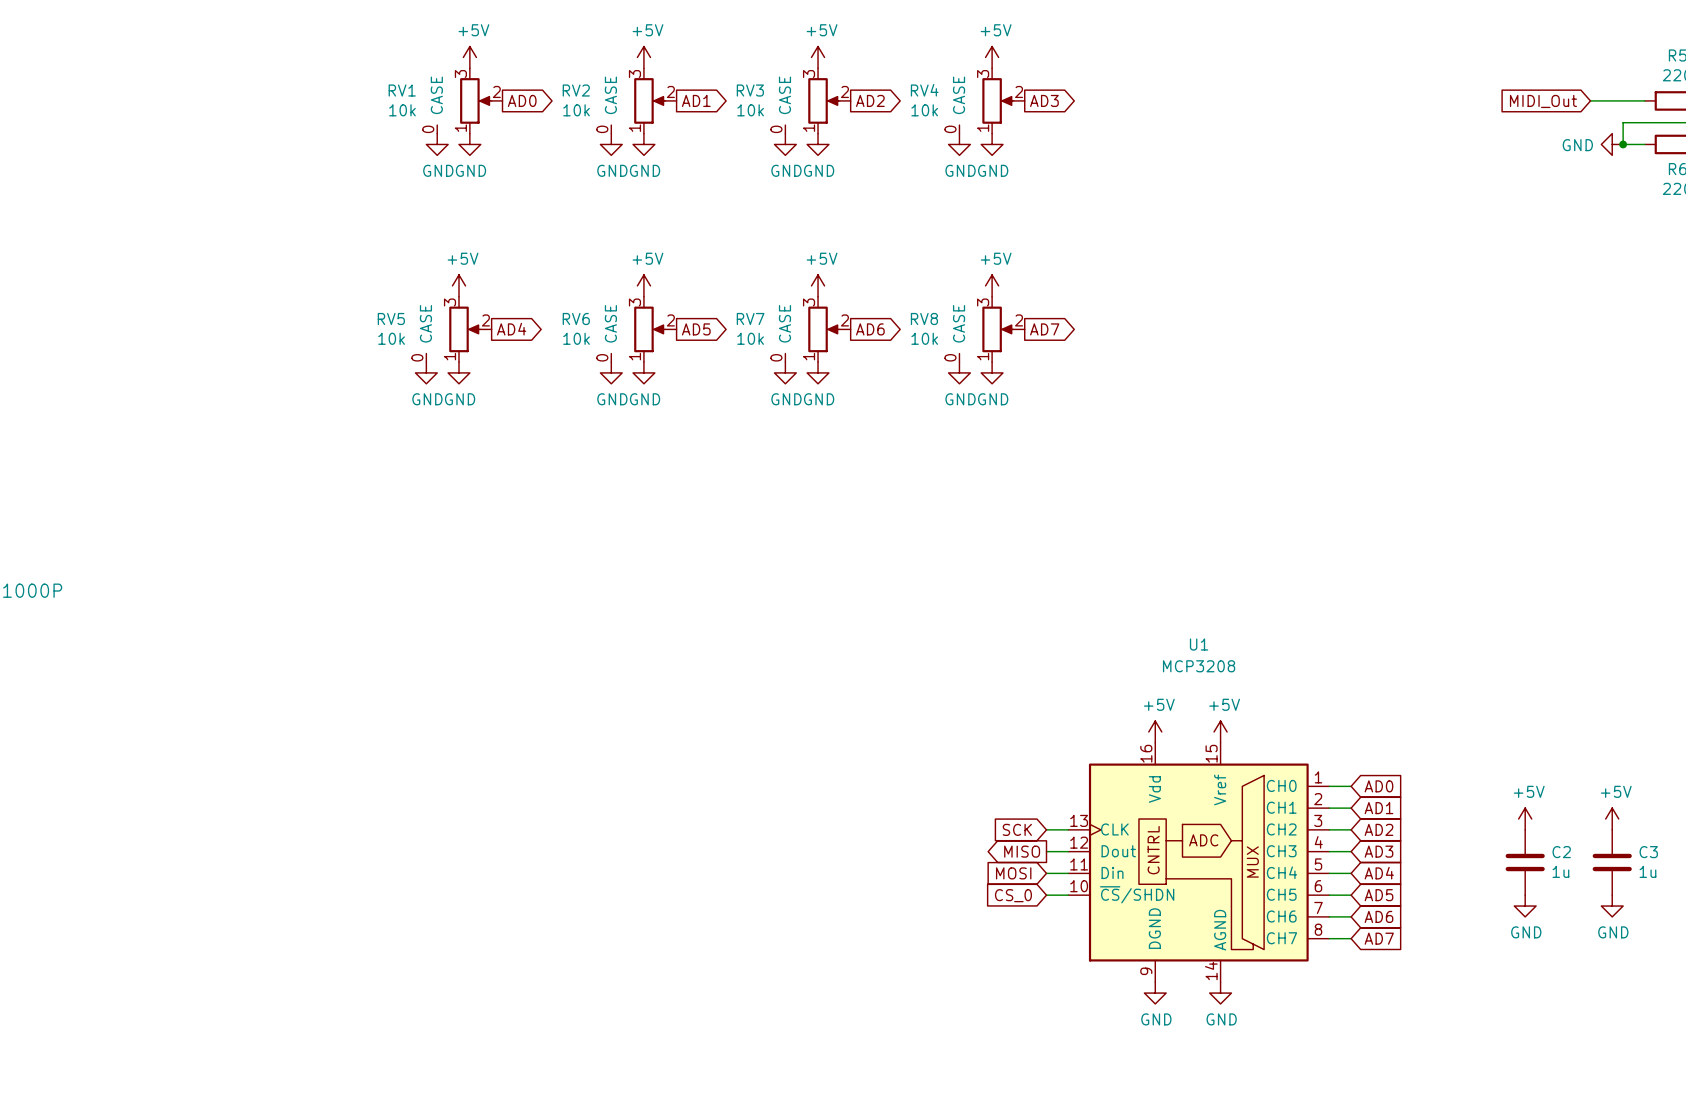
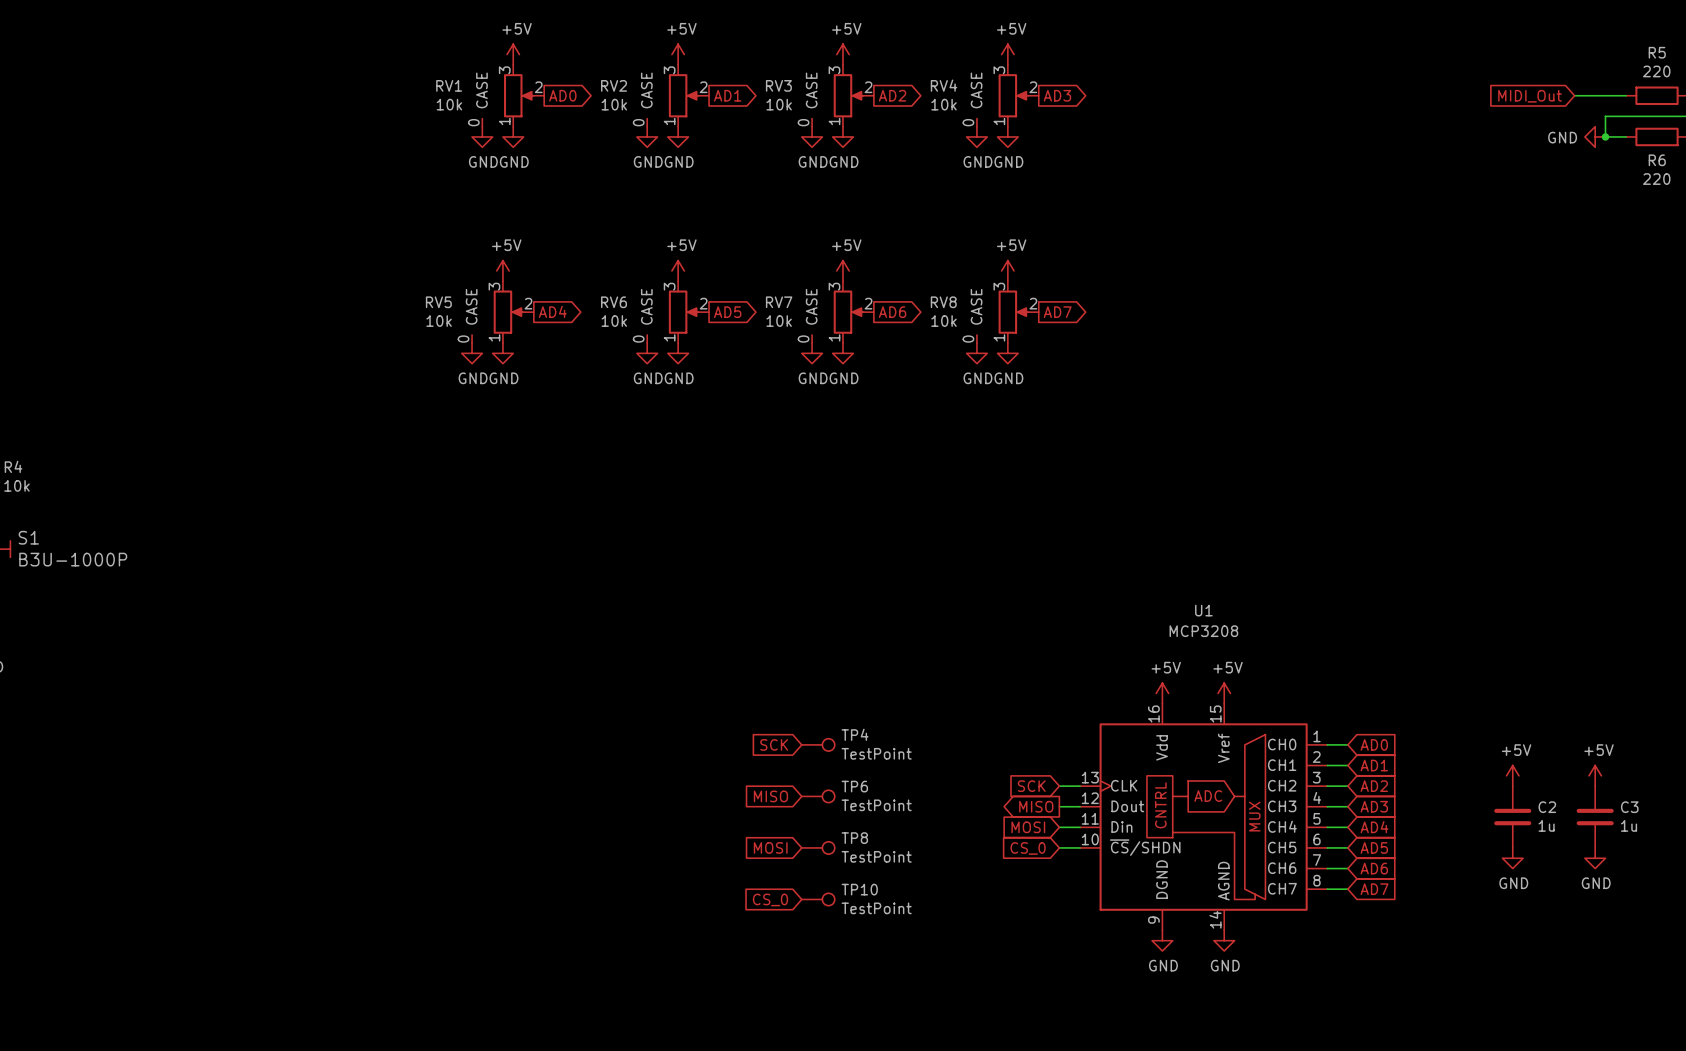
global label: none -> SCK (774, 744)
TP4: none -> TestPoint (818, 744)
global label: none -> MISO (770, 796)
TP6: none -> TestPoint (818, 796)
global label: none -> MOSI (770, 847)
TP8: none -> TestPoint (818, 847)
TP10: none -> TestPoint (818, 899)
global label: none -> CS_0 (770, 899)

